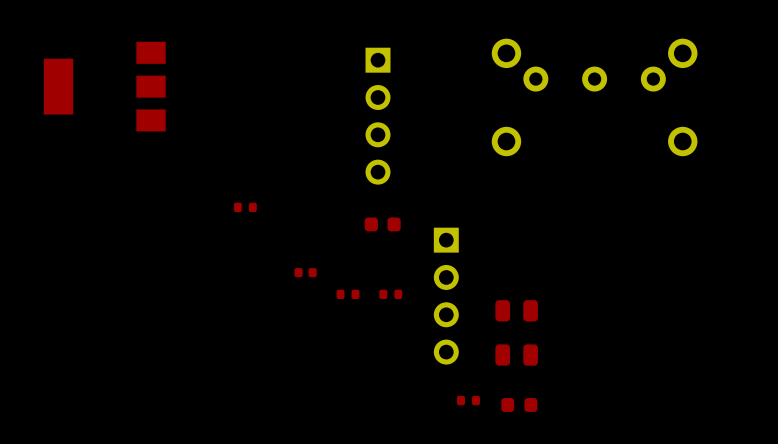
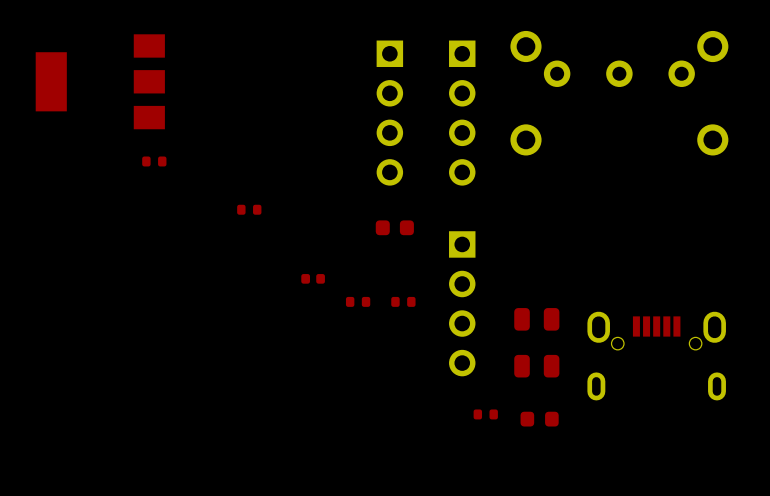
part: none -> (462, 113)
part: none -> (154, 161)
part: none -> (656, 356)

